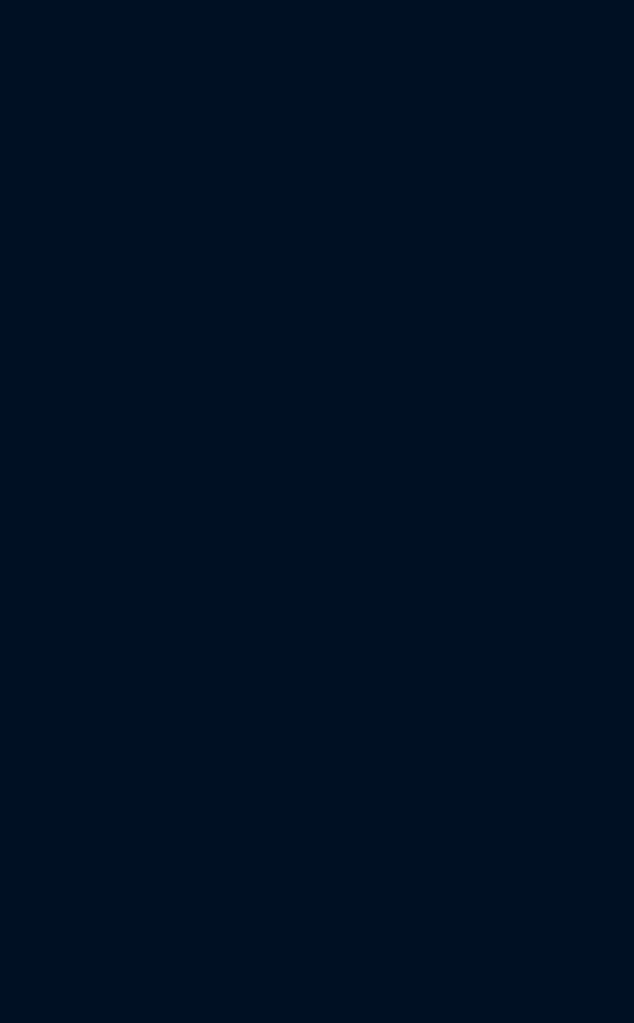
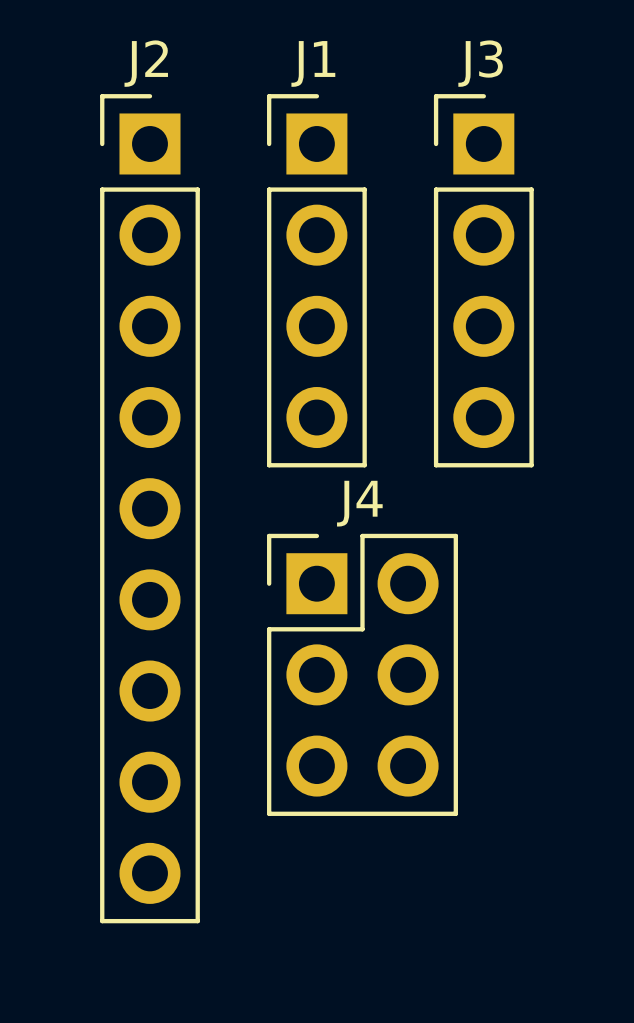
J1: none -> (316, 280)
J3: none -> (483, 280)
J2: none -> (149, 508)
J4: none -> (362, 674)

